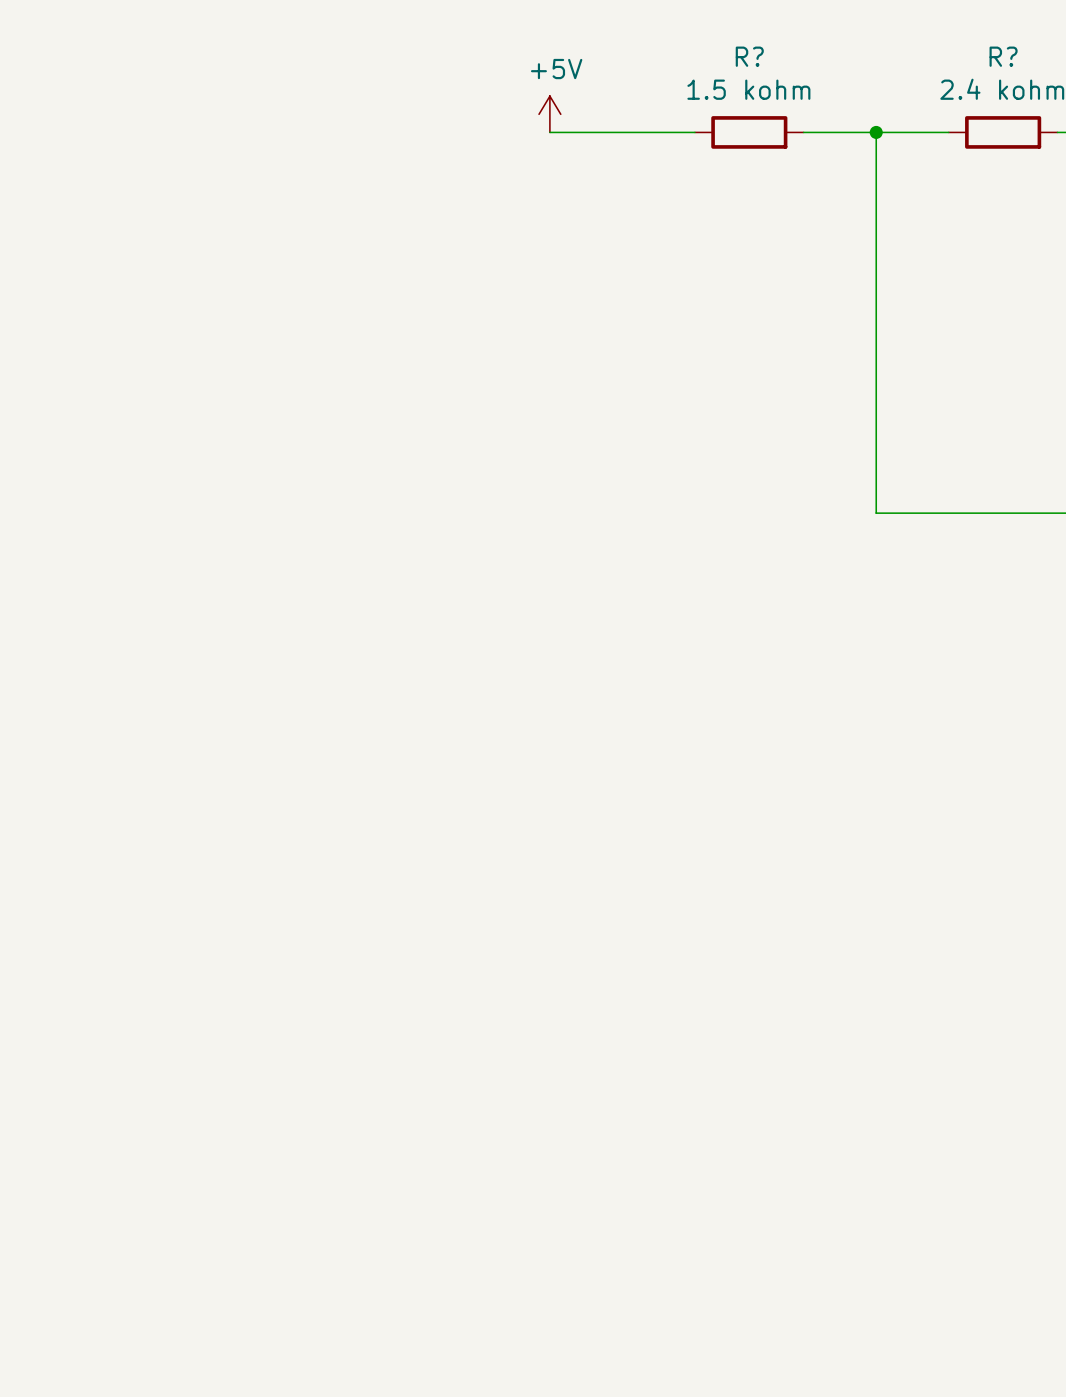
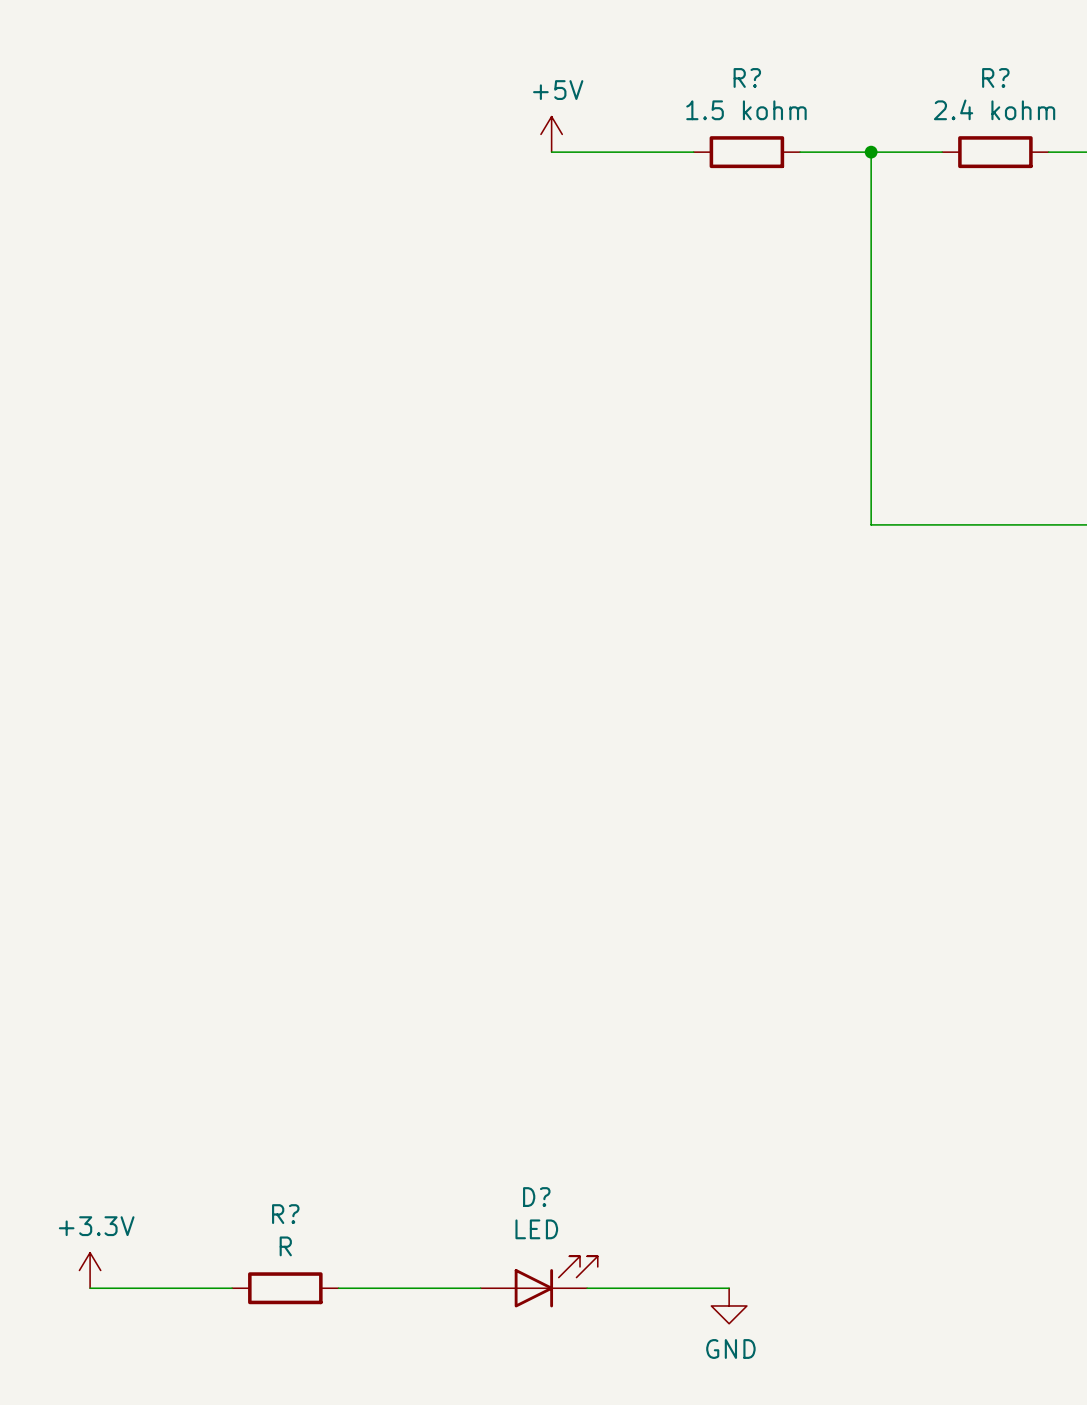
power symbol: none -> +3.3V (90, 1270)
D?: none -> LED (539, 1281)
wire: none -> (90, 1288) (232, 1288)
R?: none -> R (285, 1288)
wire: none -> (338, 1288) (480, 1288)
wire: none -> (587, 1288) (729, 1288)
power symbol: none -> GND (729, 1305)

